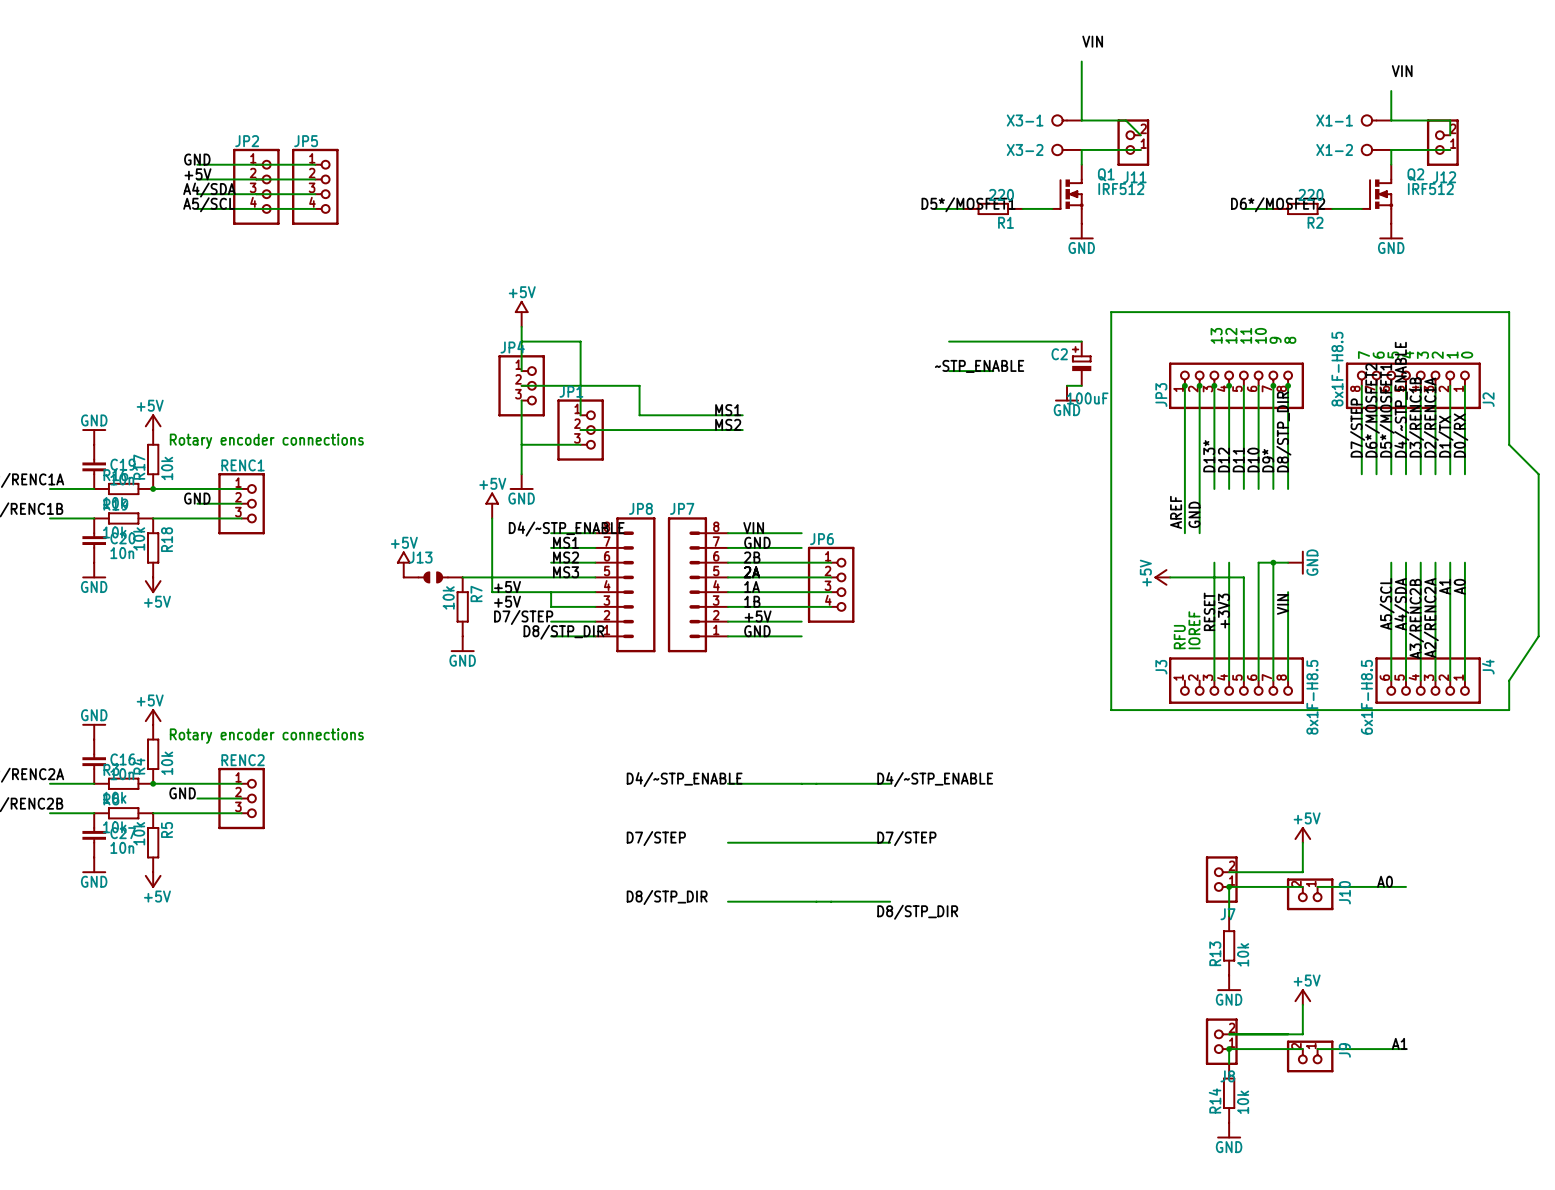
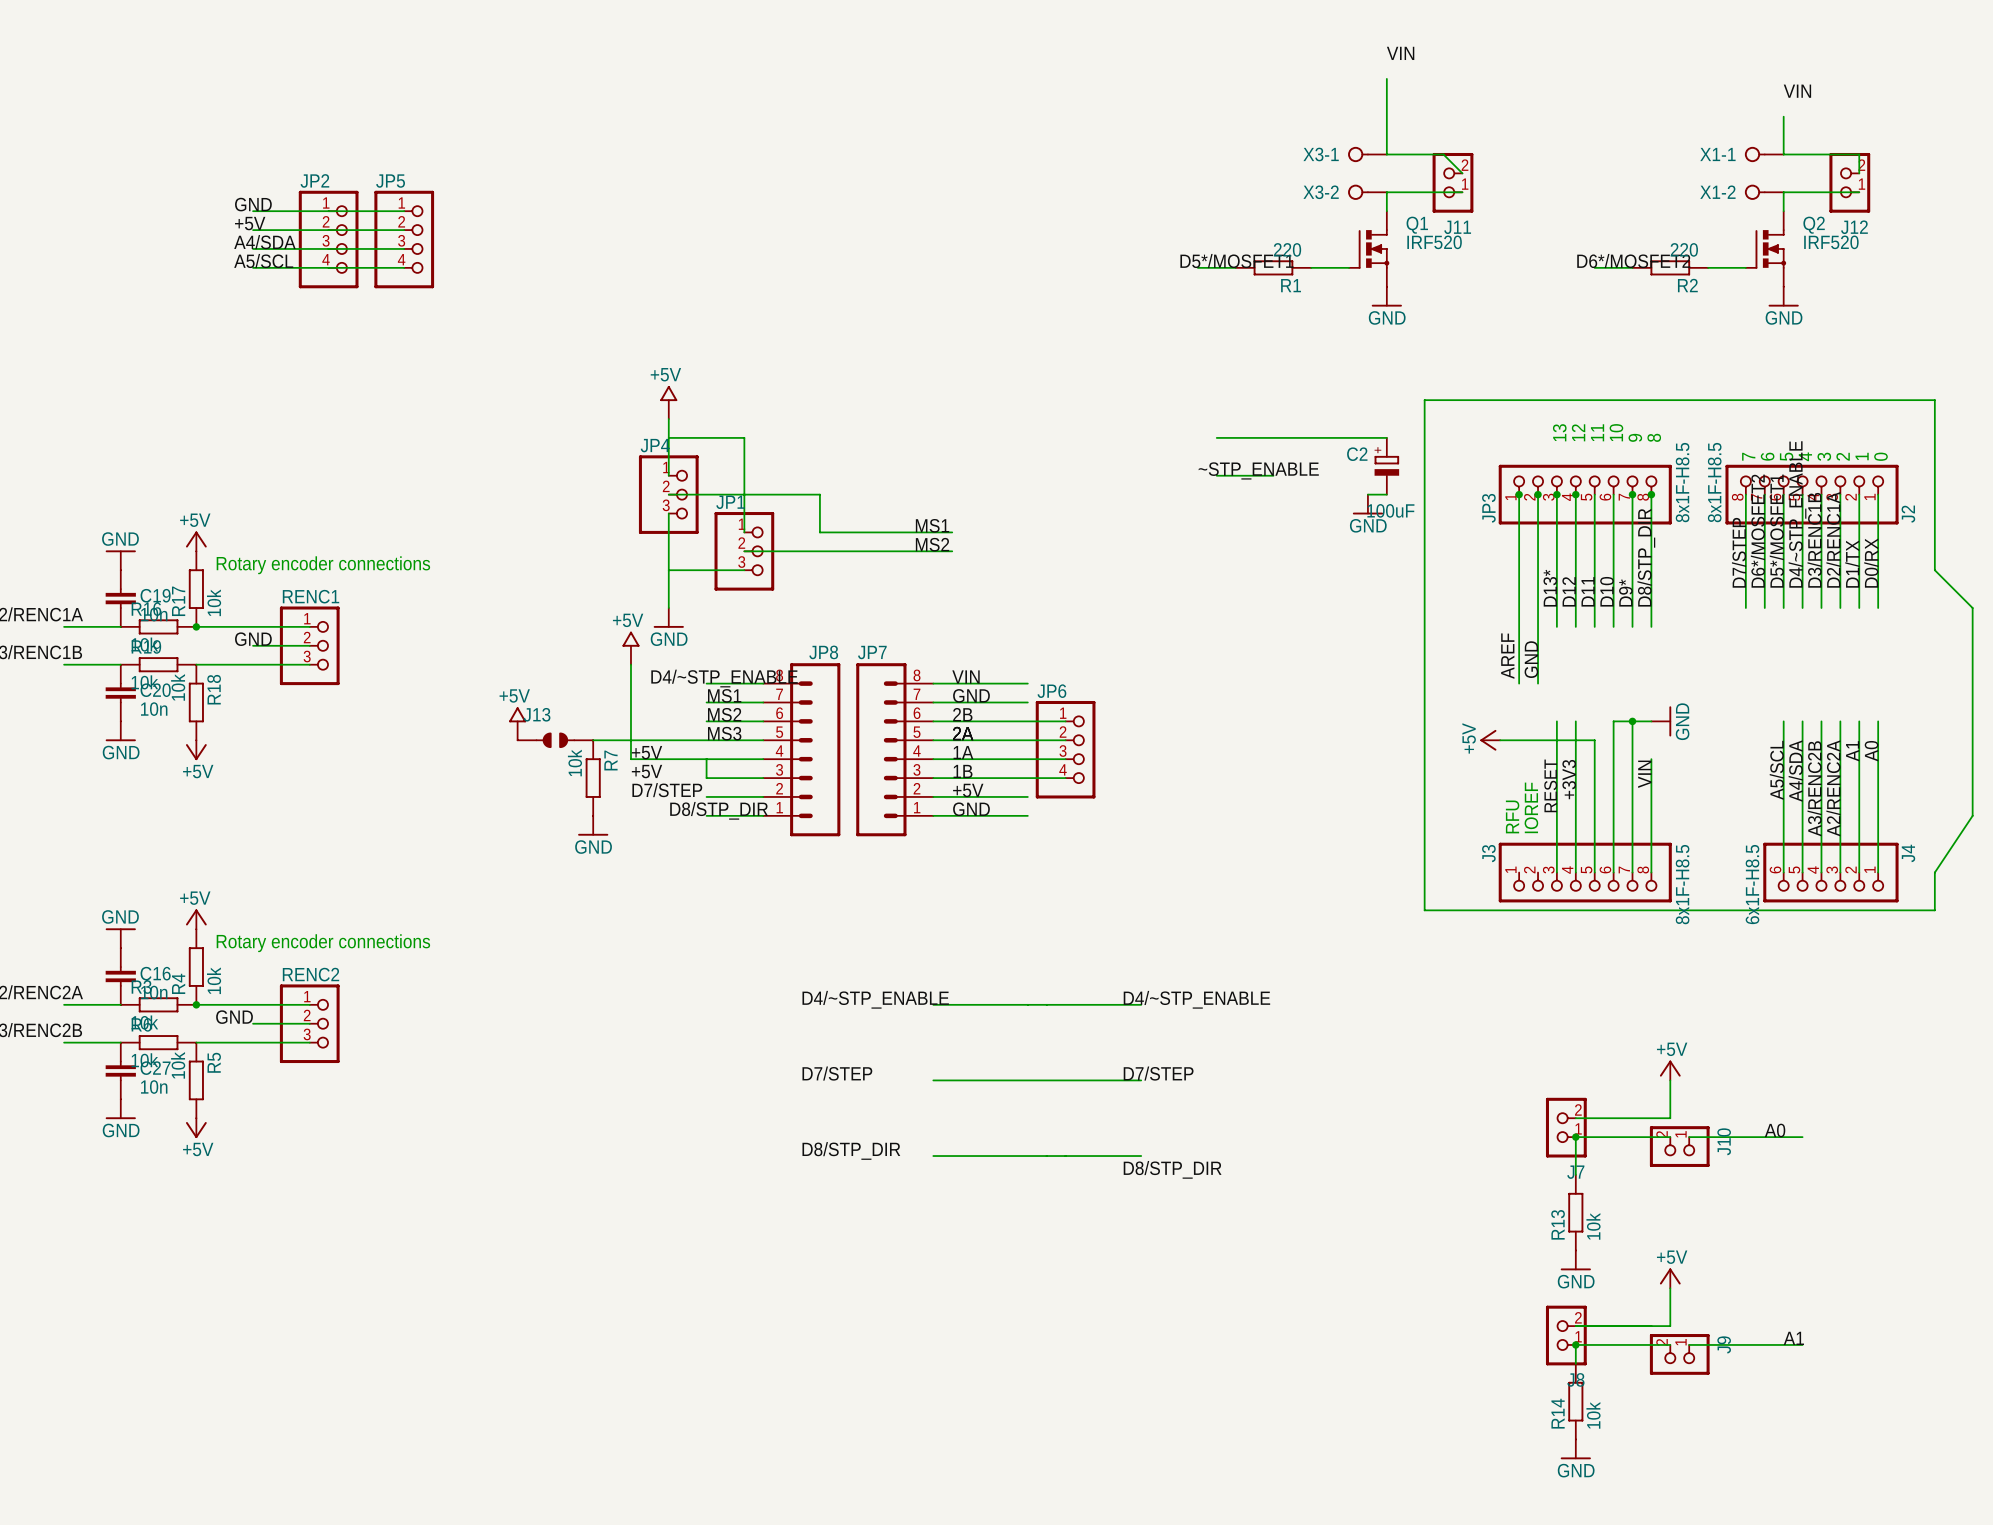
Q1 value: IRF512 (1121, 189) -> IRF520 (1434, 242)
Q2 value: IRF512 (1430, 189) -> IRF520 (1831, 242)
JP3 value: none -> 8x1F-H8.5 (1682, 482)

